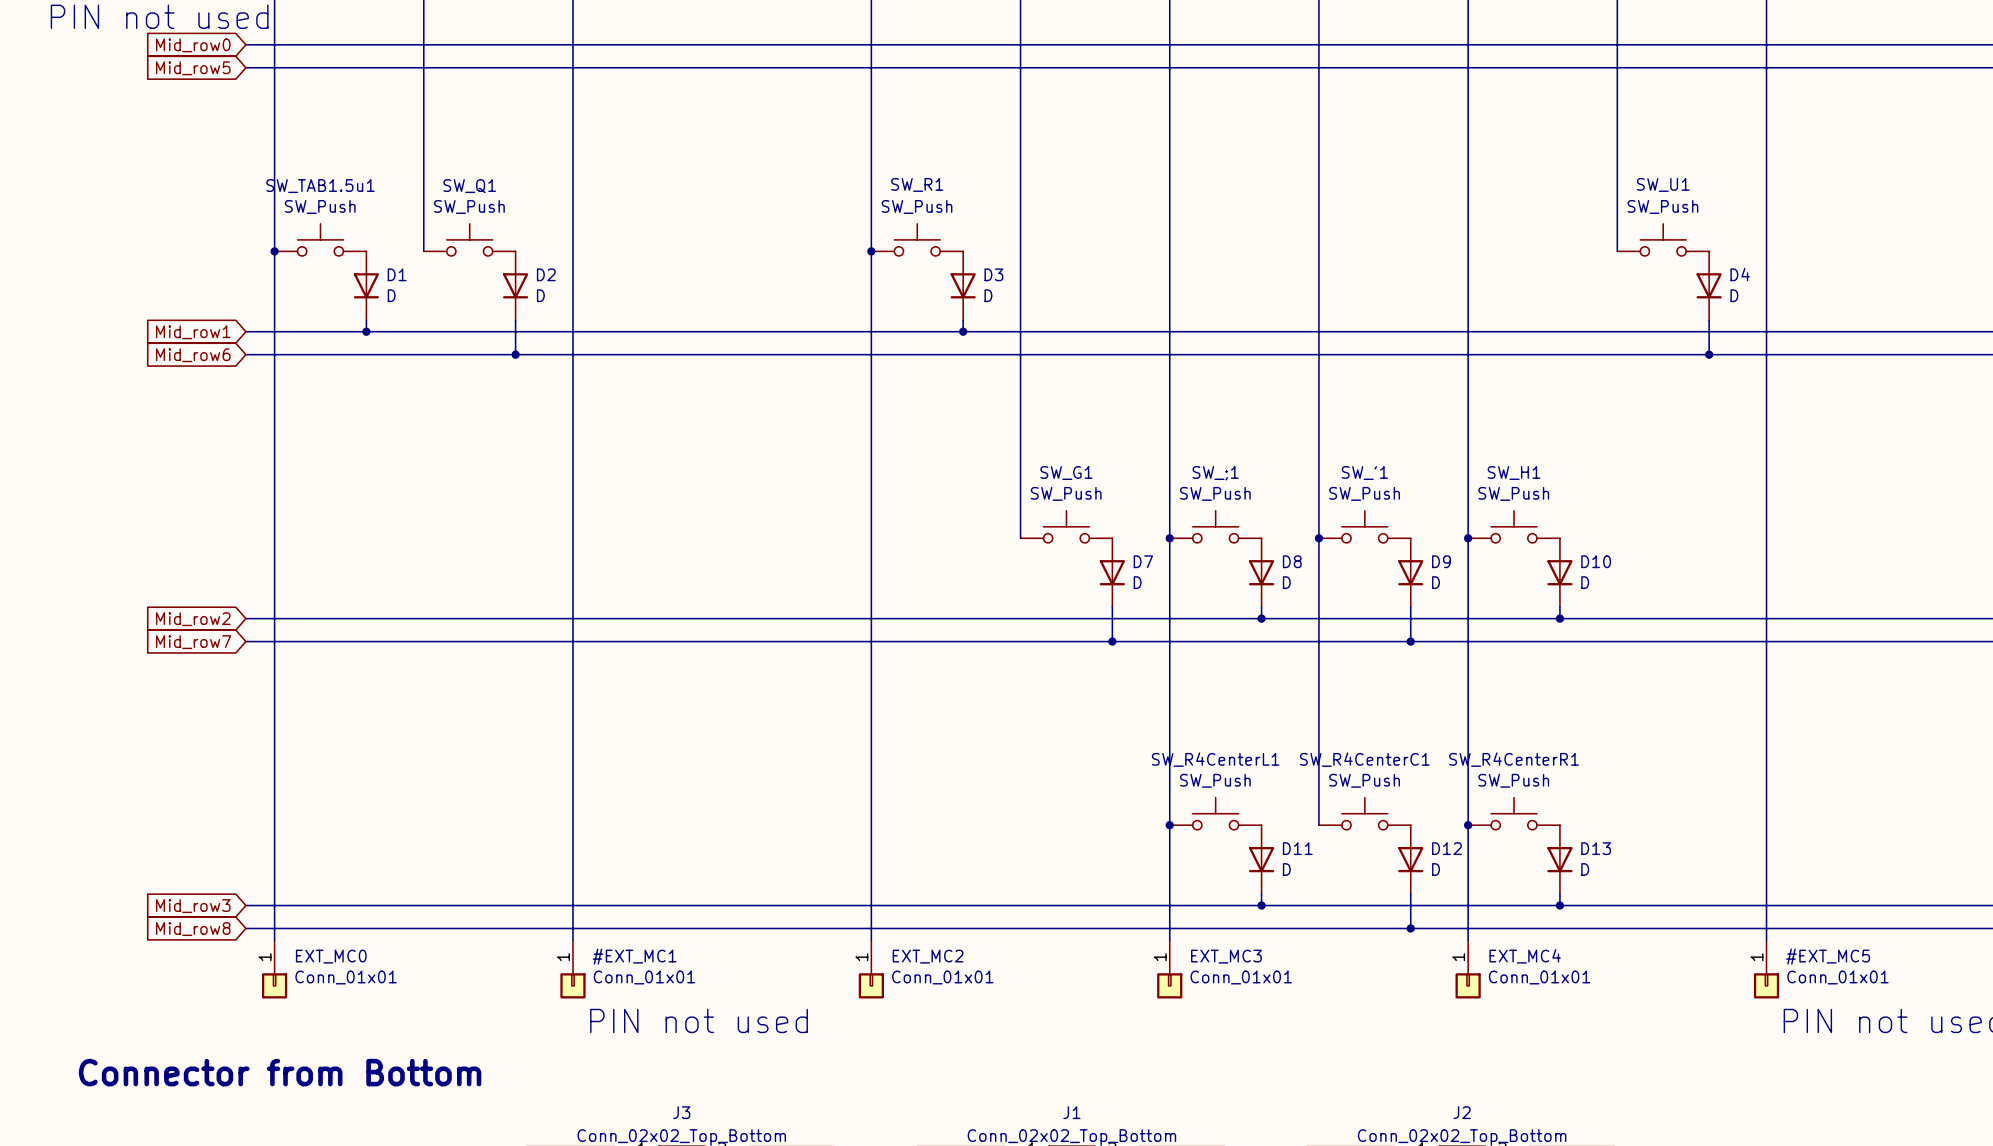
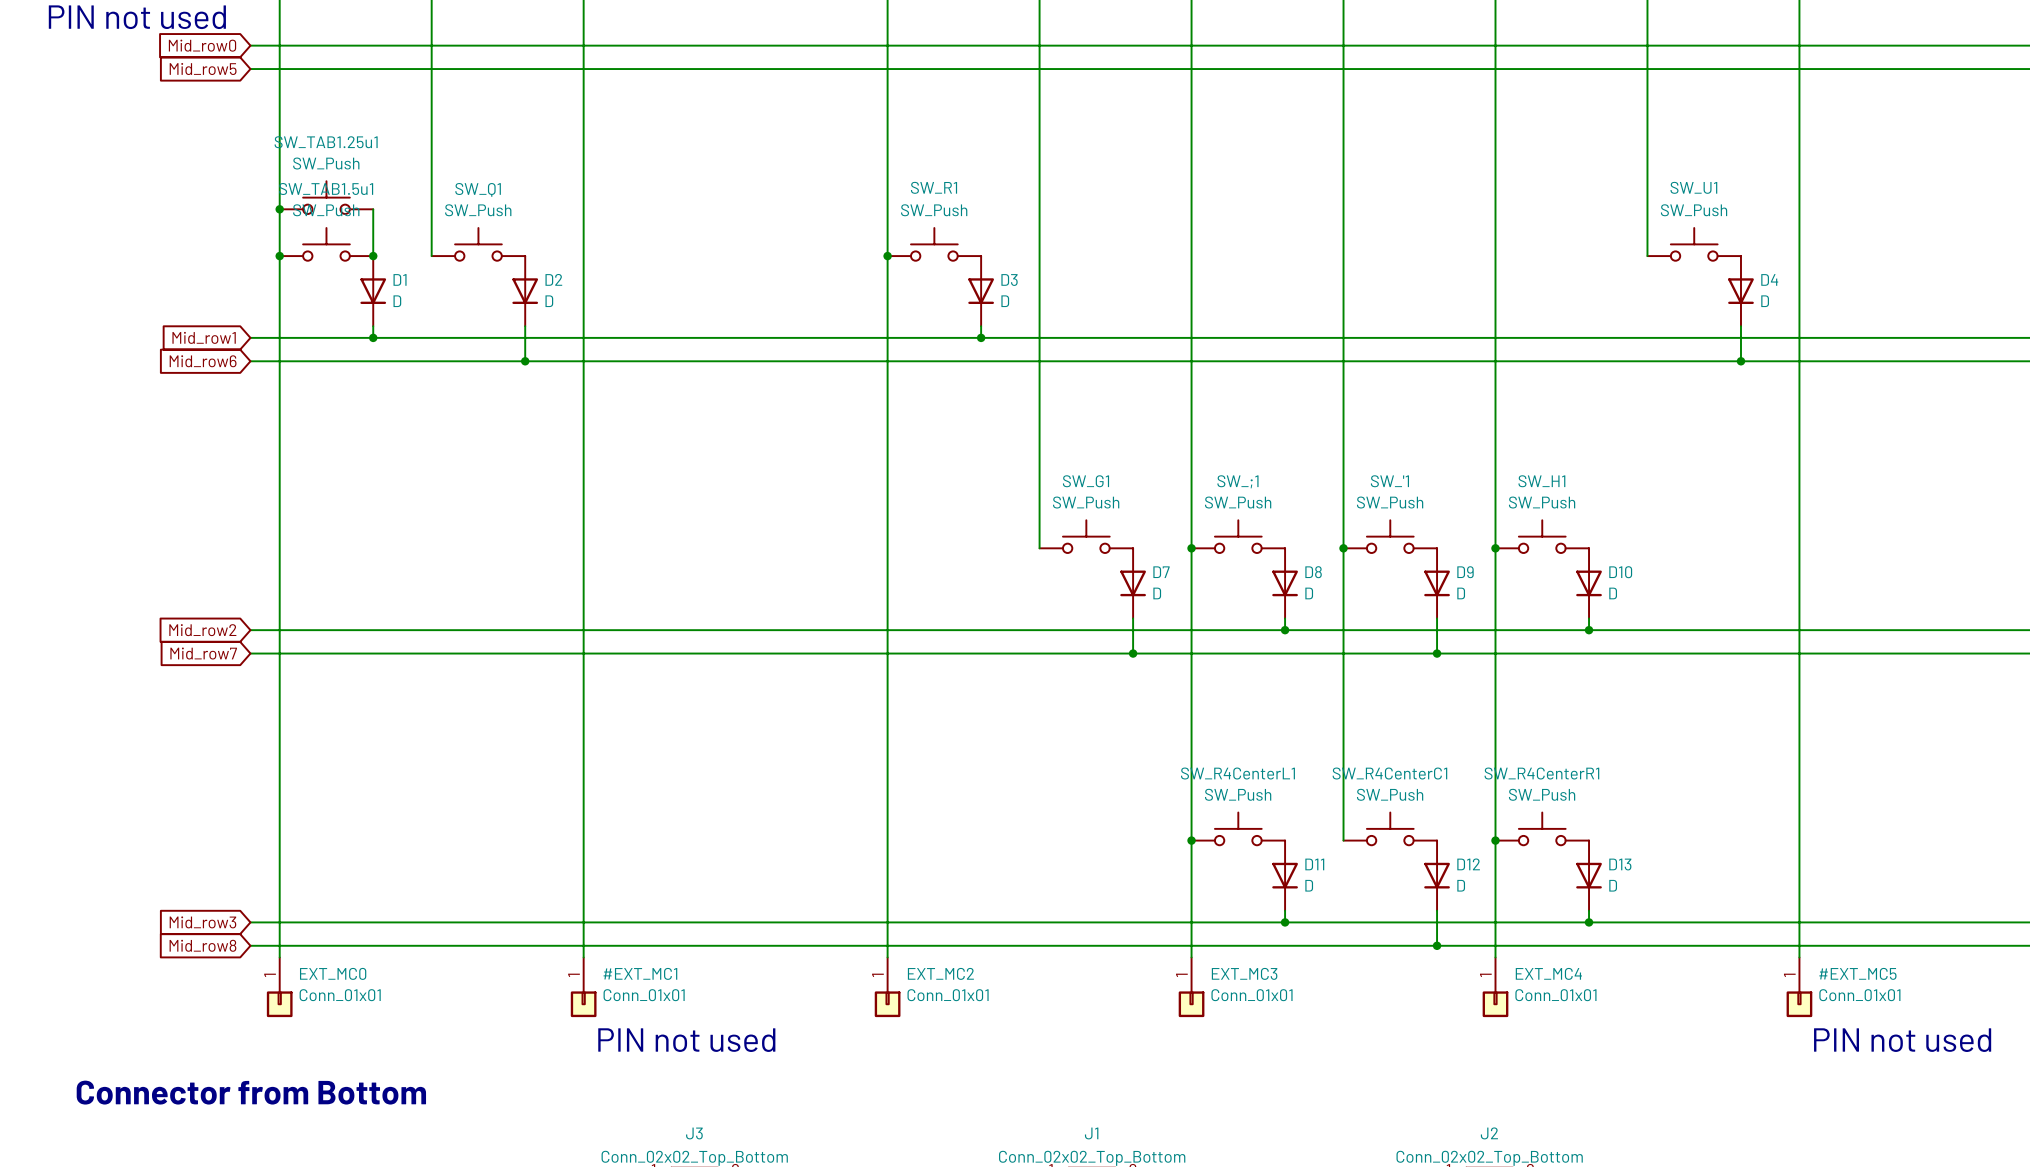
SW_TAB1.25u1: none -> SW_Push (326, 197)
junction: none -> (279, 209)
wire: none -> (373, 209) (373, 256)
junction: none -> (373, 256)

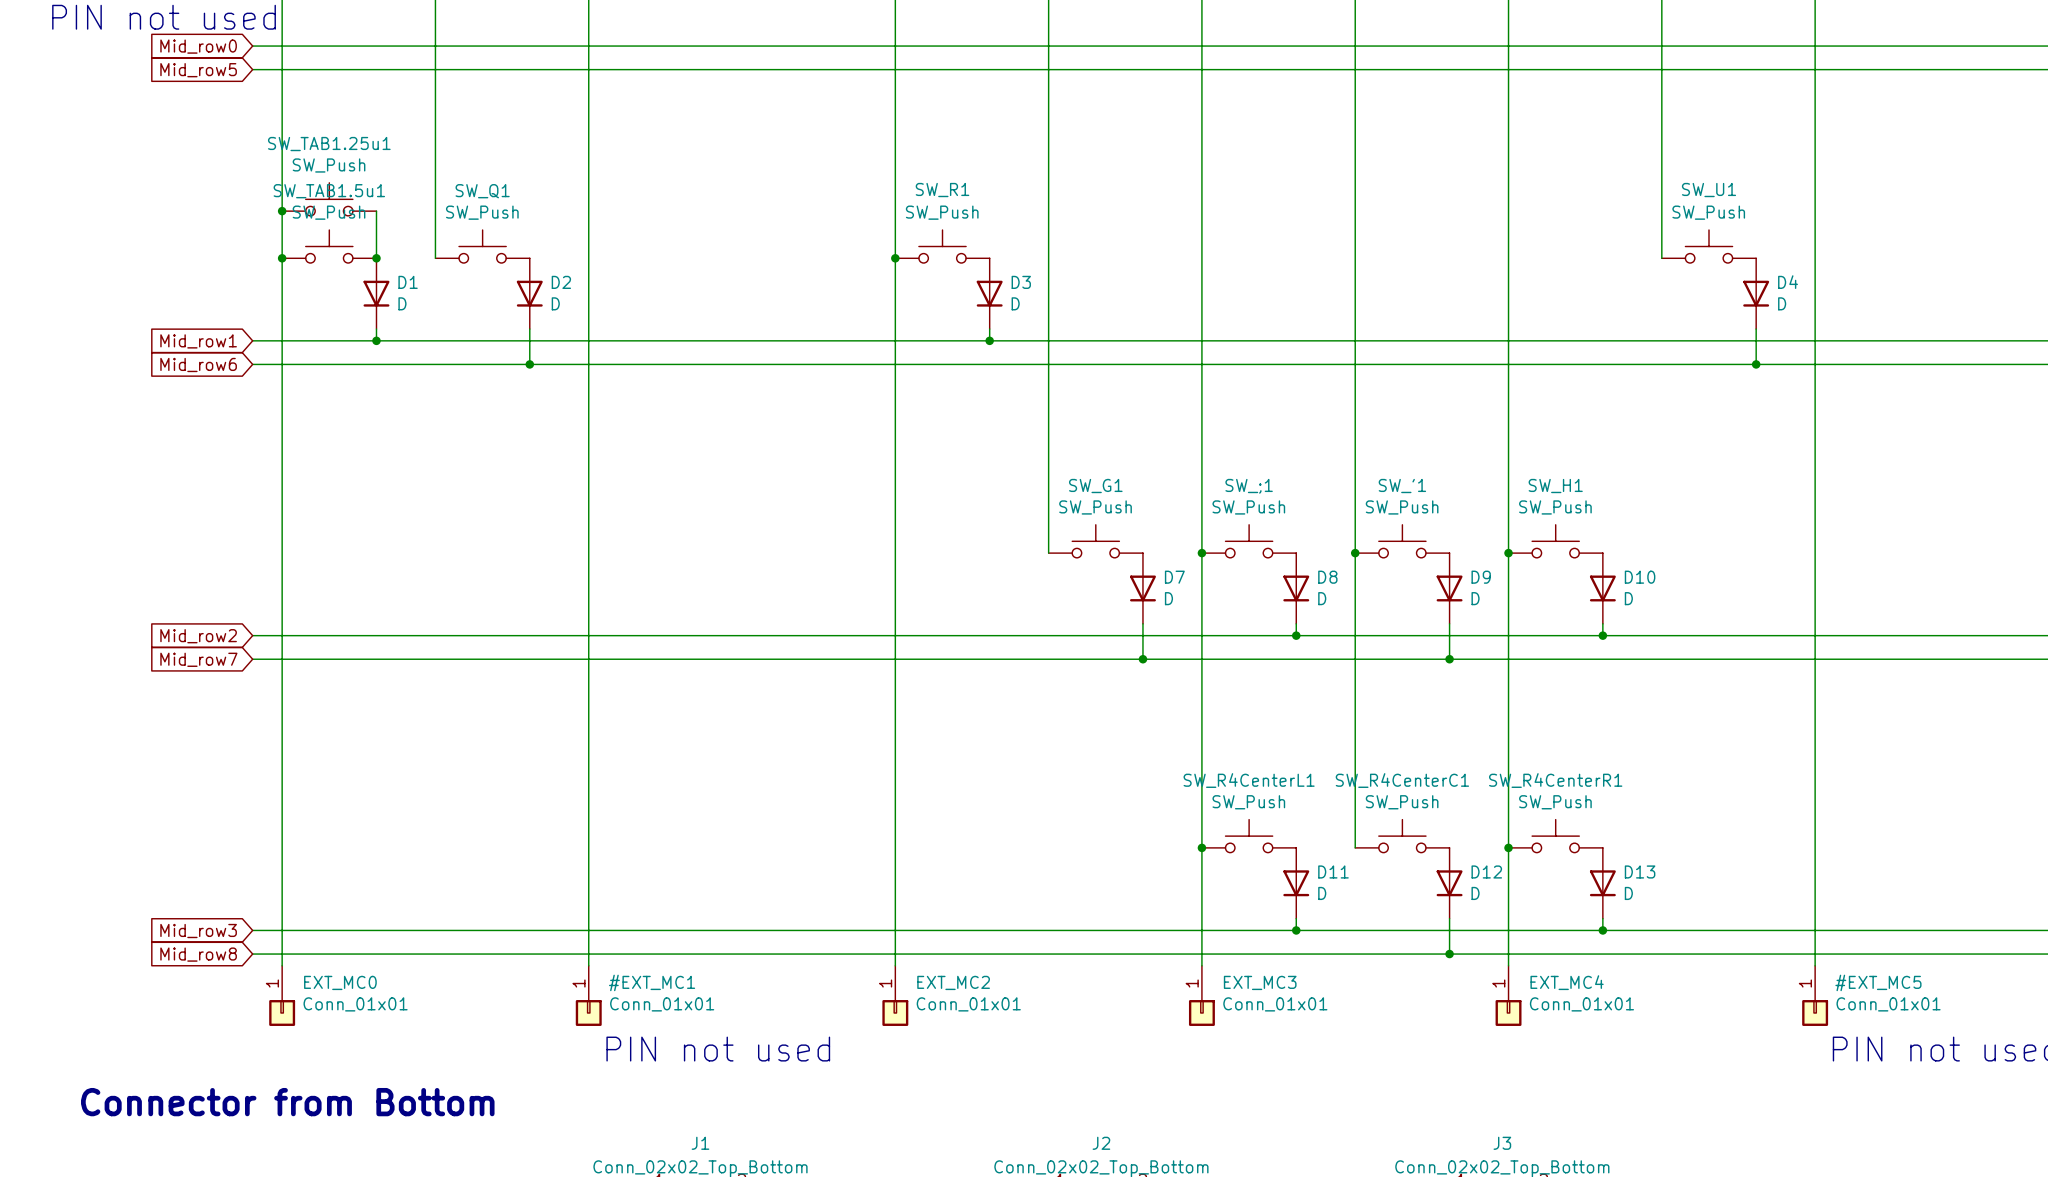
J3 name: J3 (694, 1133) -> J1 (700, 1143)
J1 name: J1 (1091, 1133) -> J2 (1101, 1143)
J2 name: J2 (1489, 1133) -> J3 (1502, 1143)

